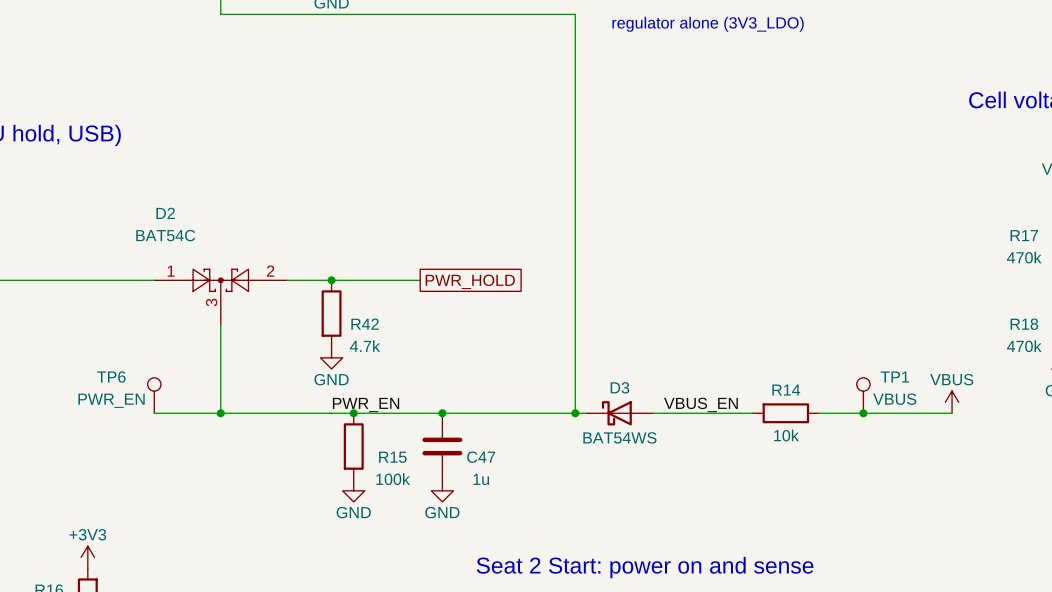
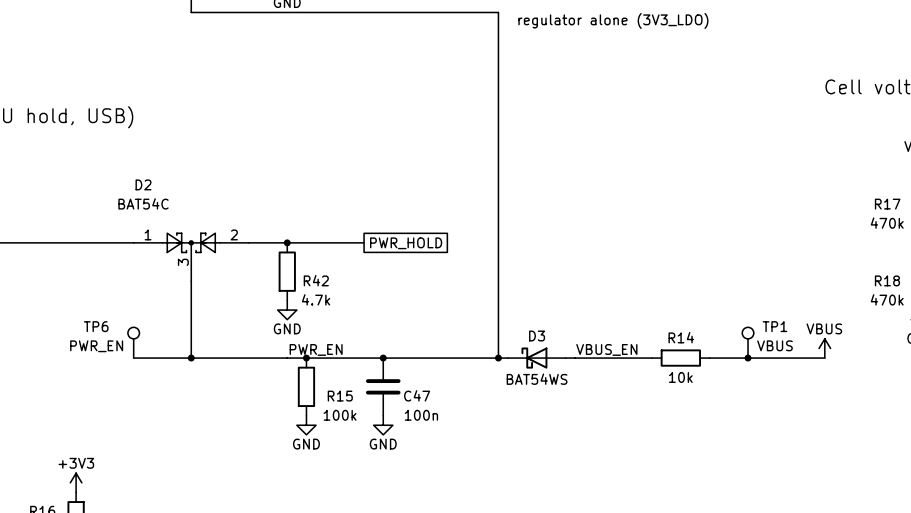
C47 value: 1u (481, 479) -> 100n (421, 415)
text: Seat 2 Start: power on and sense (645, 567) -> none

